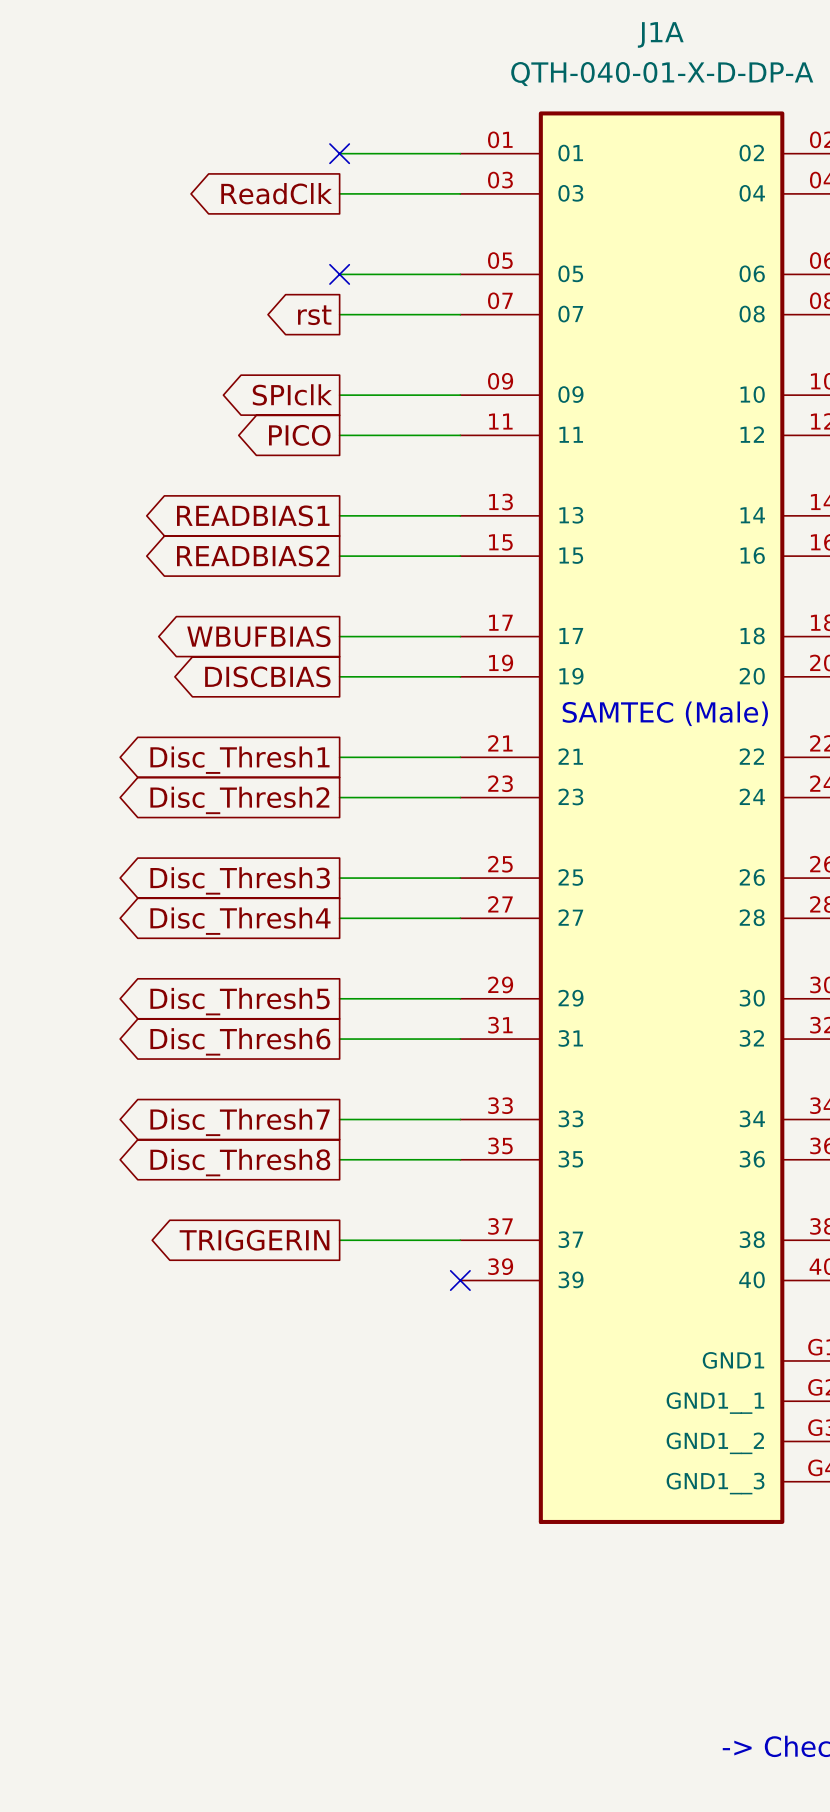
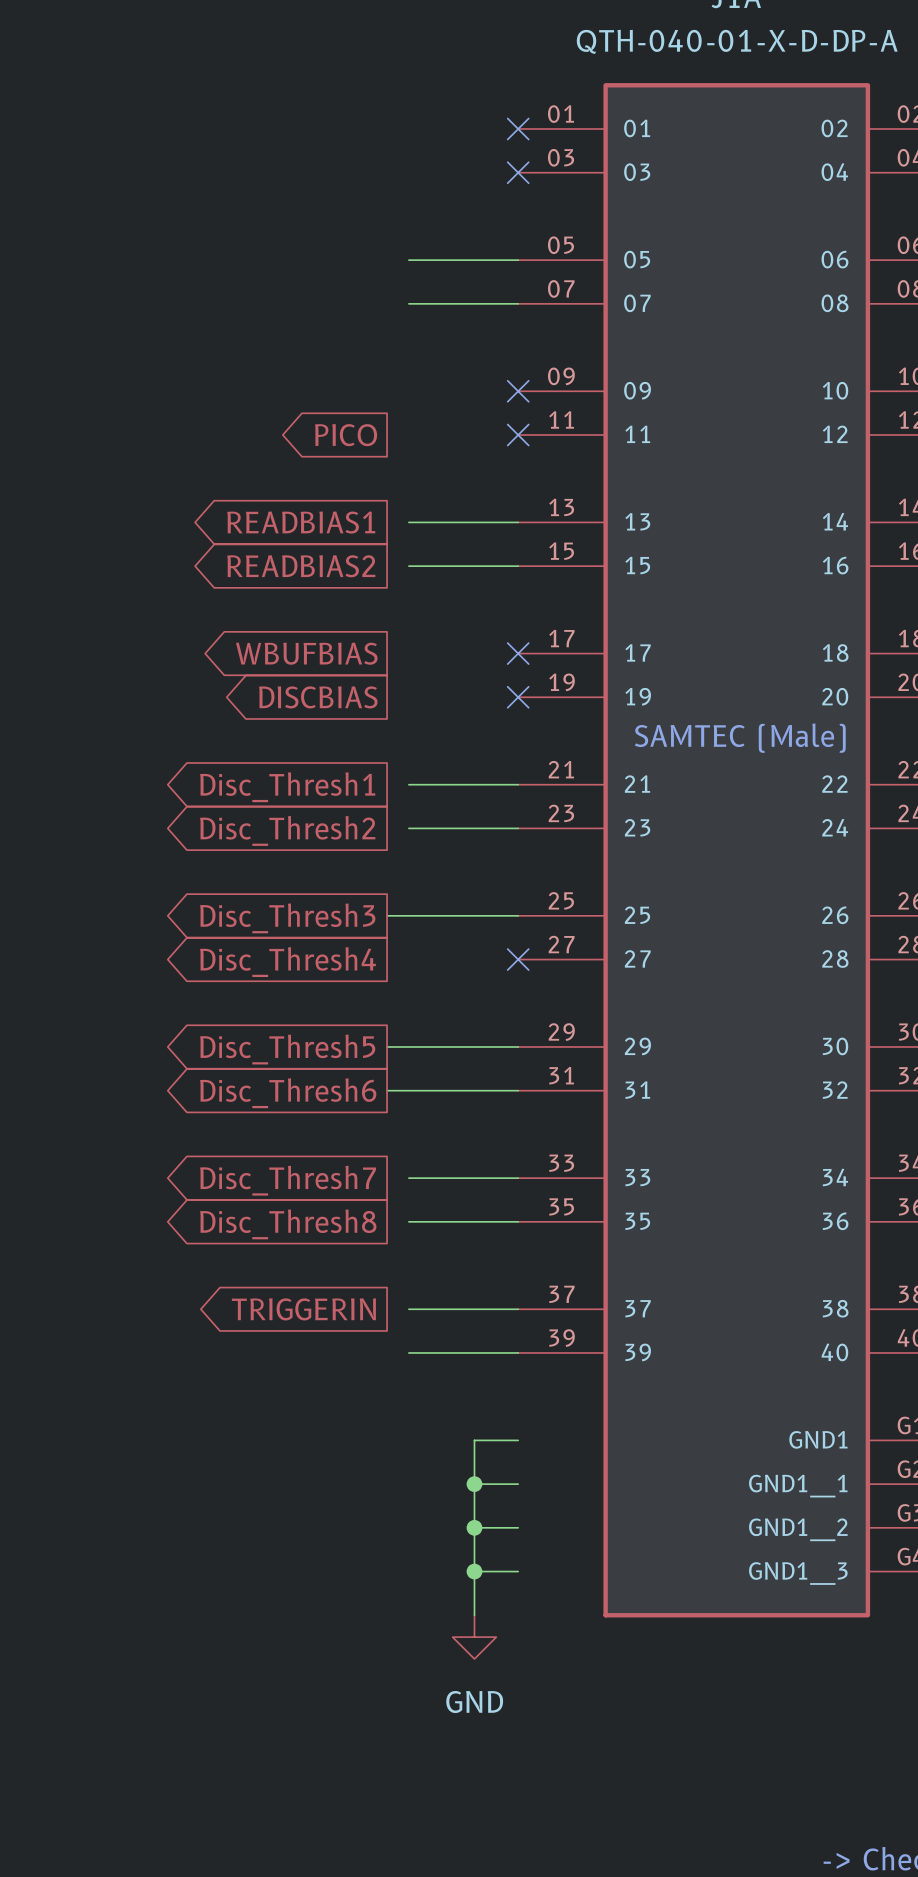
wire: (339, 153) (460, 153) -> none
no-connect mark: (339, 153) -> none
no-connect mark: none -> (518, 129)
global label: ReadClk (276, 193) -> none
wire: (339, 193) (460, 193) -> none
no-connect mark: none -> (518, 172)
wire: (339, 274) (359, 274) -> none
no-connect mark: (339, 274) -> none
wire: (339, 314) (359, 314) -> none
global label: rst (314, 315) -> none
global label: SPIclk (292, 394) -> none
wire: (339, 395) (460, 395) -> none
no-connect mark: none -> (518, 391)
wire: (339, 435) (460, 435) -> none
no-connect mark: none -> (518, 434)
wire: (339, 515) (359, 515) -> none
wire: (339, 556) (359, 556) -> none
wire: (339, 636) (460, 636) -> none
no-connect mark: none -> (518, 653)
wire: (339, 676) (460, 676) -> none
no-connect mark: none -> (518, 697)
wire: (339, 757) (359, 757) -> none
wire: (339, 797) (359, 797) -> none
wire: (339, 918) (460, 918) -> none
no-connect mark: none -> (518, 959)
wire: (339, 1119) (359, 1119) -> none
wire: (339, 1159) (359, 1159) -> none
wire: (339, 1240) (359, 1240) -> none
wire: none -> (408, 1352) (518, 1352)
no-connect mark: (460, 1280) -> none
wire: none -> (518, 1440) (474, 1440) (474, 1615)
wire: none -> (474, 1484) (518, 1484)
junction: none -> (474, 1484)
wire: none -> (474, 1527) (518, 1527)
junction: none -> (474, 1527)
wire: none -> (474, 1571) (518, 1571)
junction: none -> (474, 1571)
power symbol: none -> GND (474, 1637)

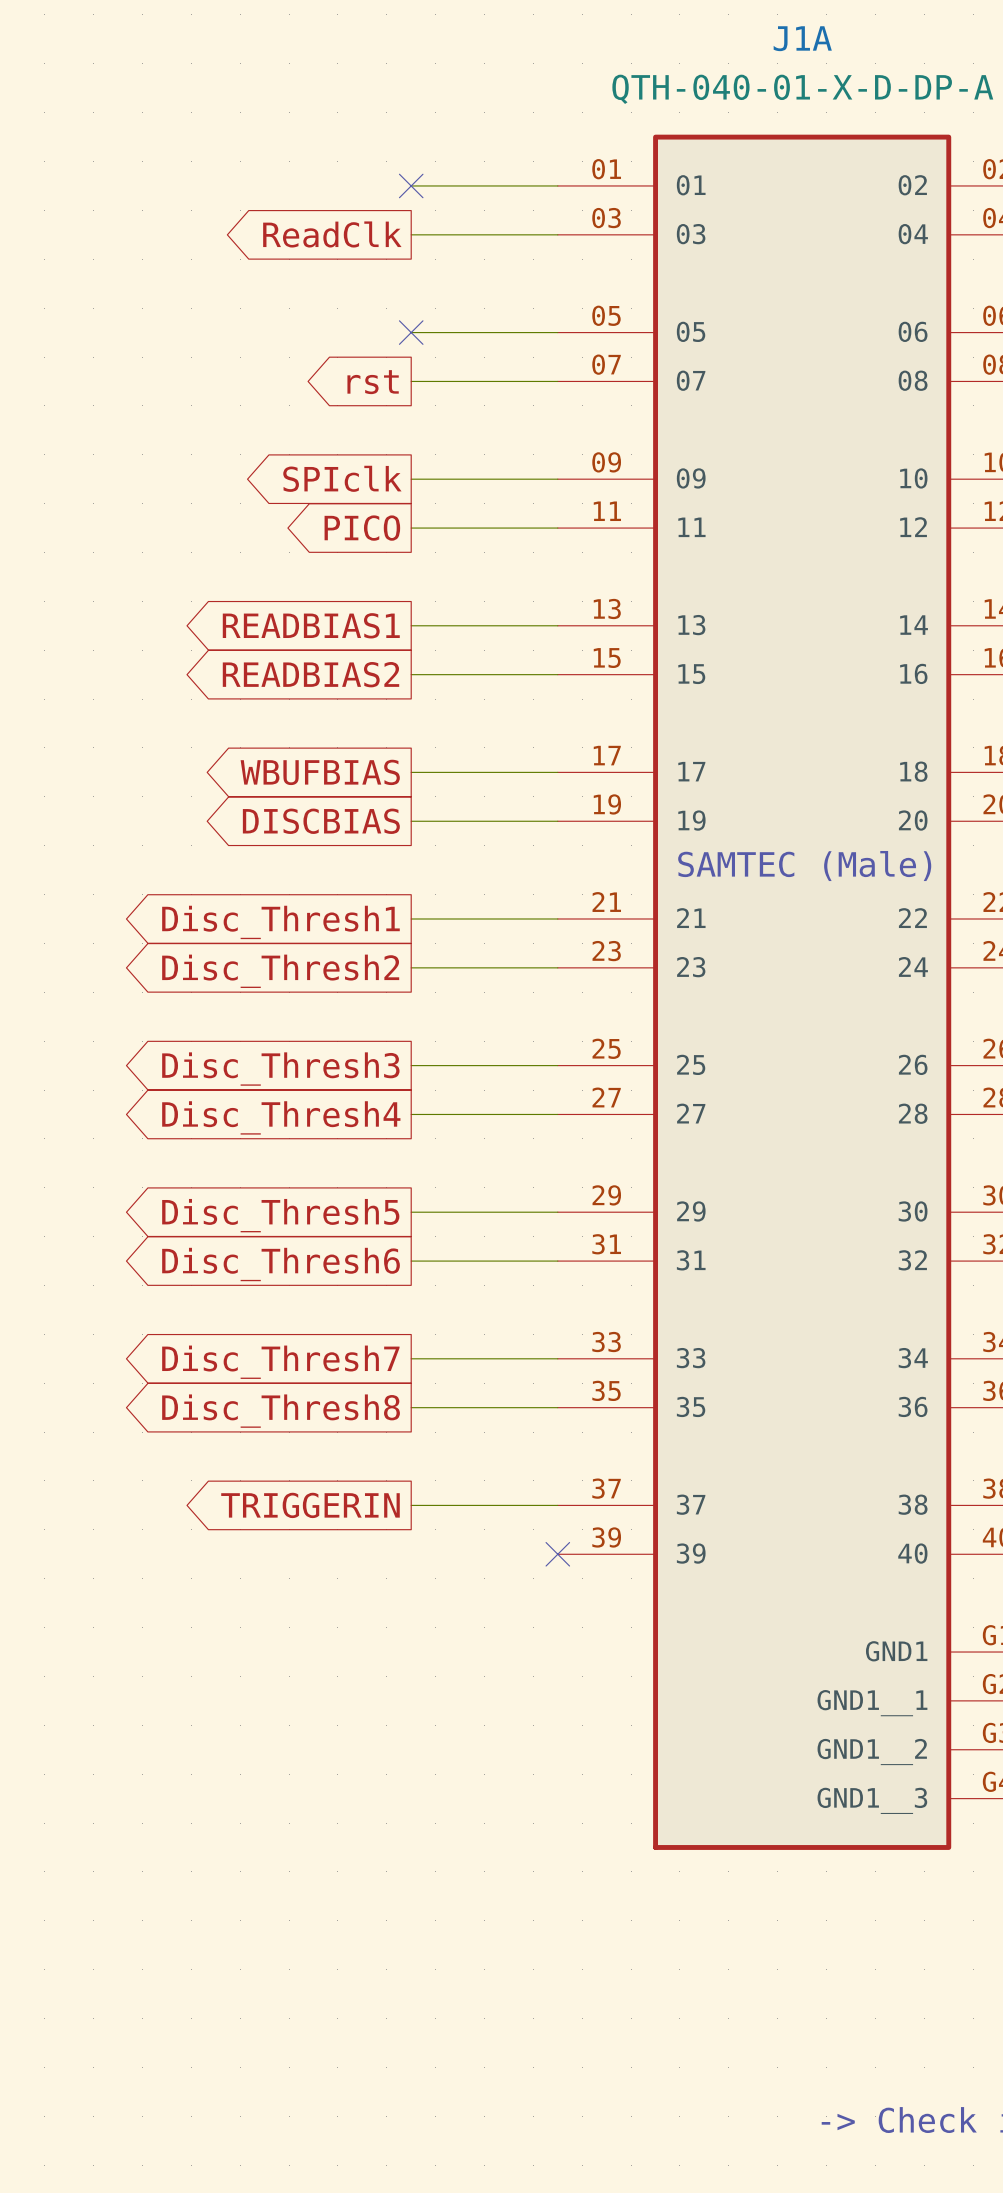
wire: none -> (411, 185) (557, 185)
no-connect mark: none -> (411, 185)
no-connect mark: (518, 129) -> none
global label: none -> ReadClk (332, 234)
wire: none -> (411, 234) (557, 234)
no-connect mark: (518, 172) -> none
wire: none -> (411, 332) (435, 332)
no-connect mark: none -> (411, 332)
wire: none -> (411, 381) (435, 381)
global label: none -> rst (373, 382)
global label: none -> SPIclk (342, 478)
wire: none -> (411, 479) (557, 479)
no-connect mark: (518, 391) -> none
wire: none -> (411, 528) (557, 528)
no-connect mark: (518, 434) -> none
wire: none -> (411, 625) (435, 625)
wire: none -> (411, 674) (435, 674)
wire: none -> (411, 772) (557, 772)
no-connect mark: (518, 653) -> none
wire: none -> (411, 821) (557, 821)
no-connect mark: (518, 697) -> none
wire: none -> (411, 918) (435, 918)
wire: none -> (411, 967) (435, 967)
wire: none -> (411, 1114) (557, 1114)
no-connect mark: (518, 959) -> none
wire: none -> (411, 1358) (435, 1358)
wire: none -> (411, 1407) (435, 1407)
wire: none -> (411, 1505) (435, 1505)
wire: (408, 1352) (518, 1352) -> none
no-connect mark: none -> (557, 1554)
wire: (518, 1440) (474, 1440) (474, 1615) -> none
wire: (474, 1484) (518, 1484) -> none
junction: (474, 1484) -> none
wire: (474, 1527) (518, 1527) -> none
junction: (474, 1527) -> none
wire: (474, 1571) (518, 1571) -> none
junction: (474, 1571) -> none
power symbol: GND (474, 1637) -> none

